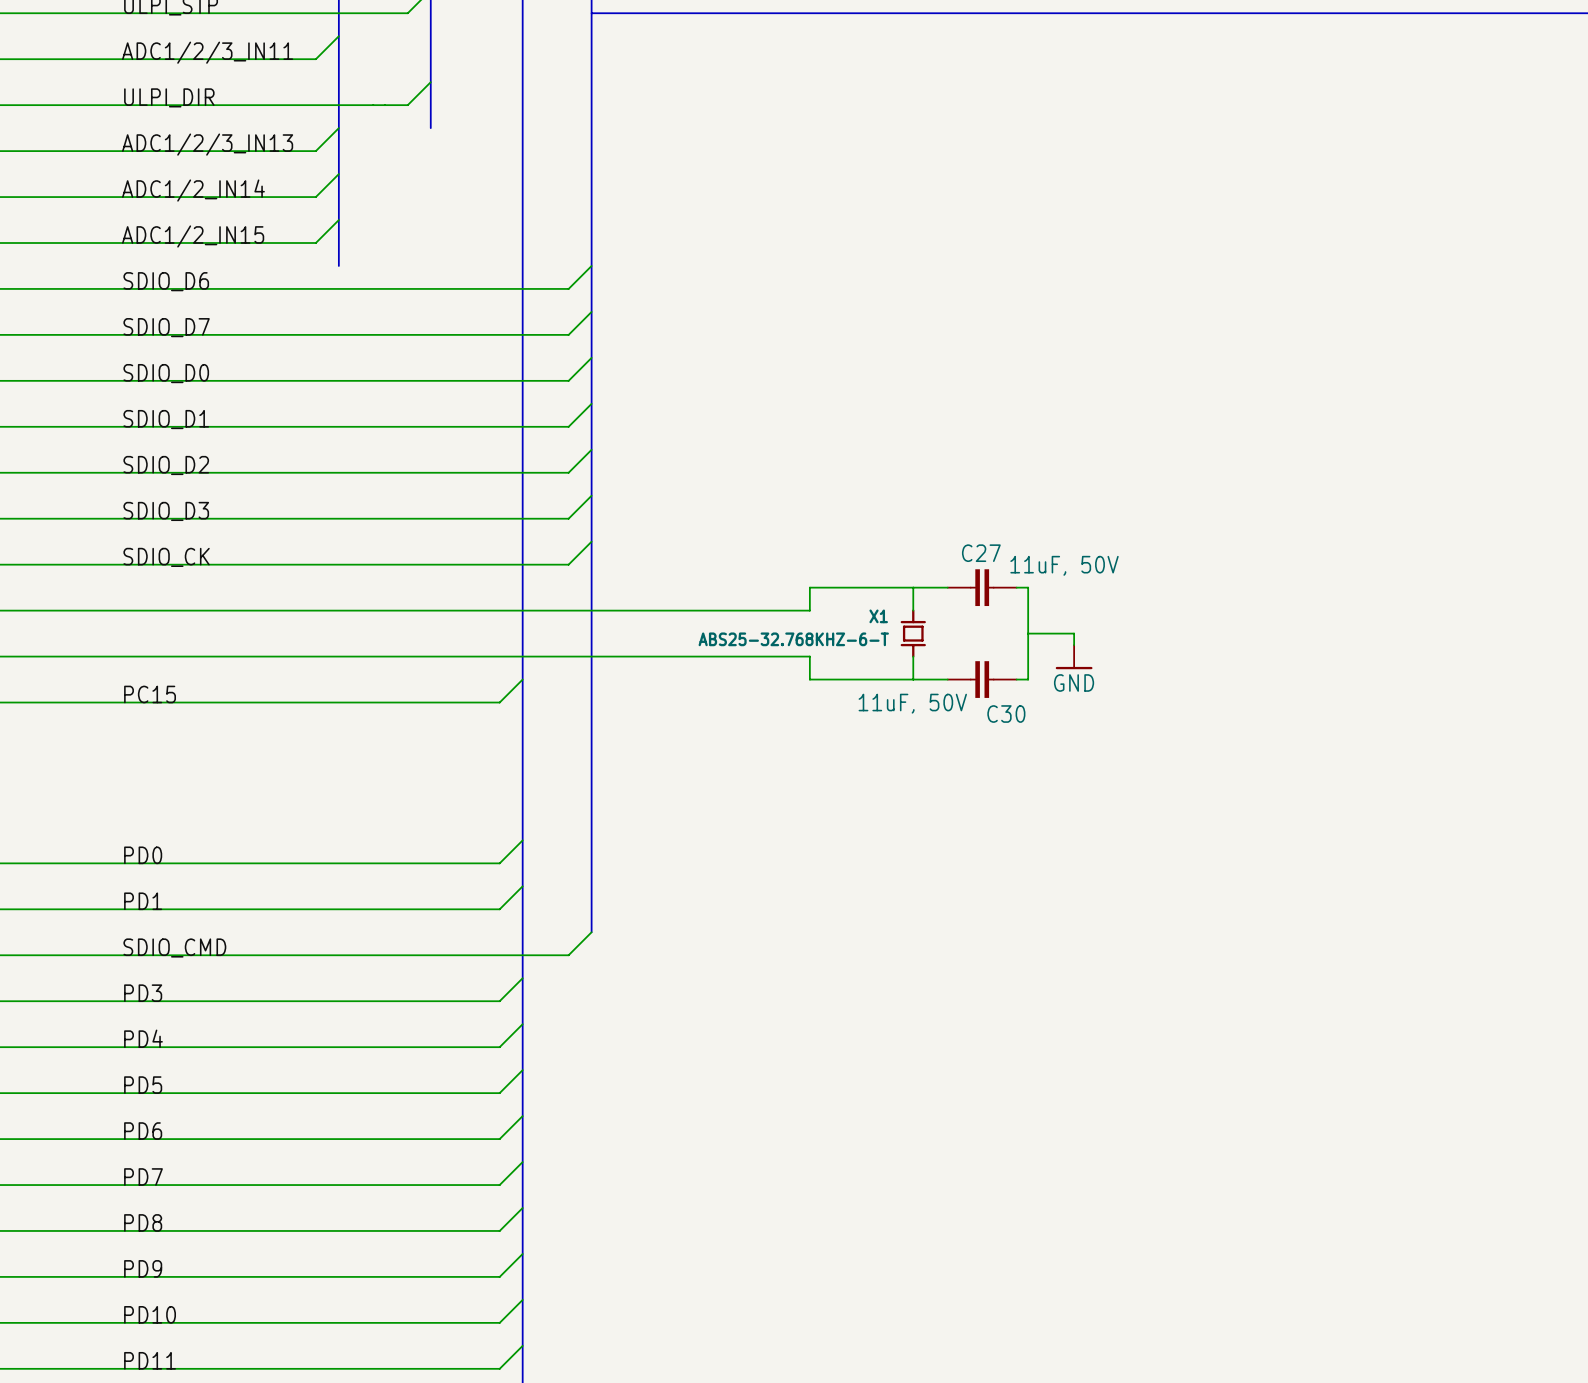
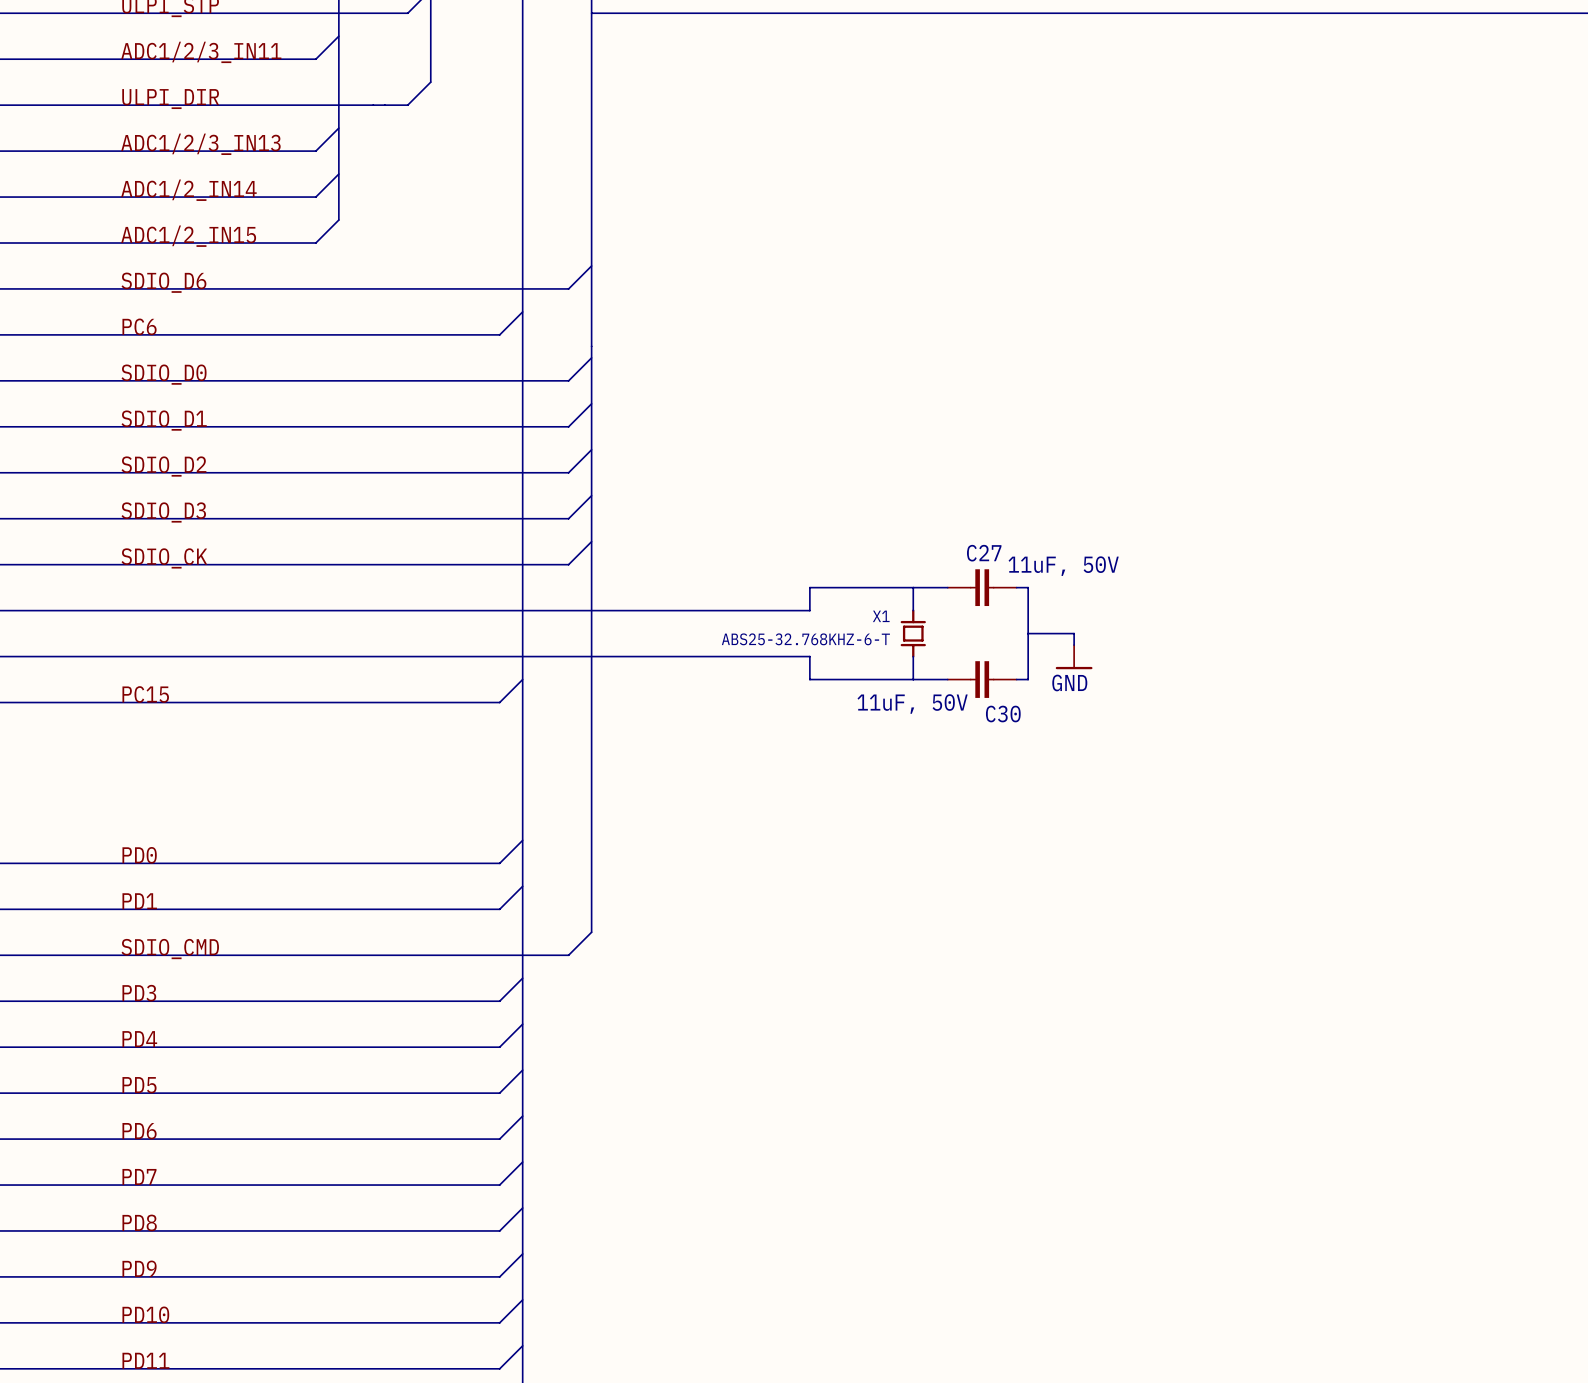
bus: (430, 82) (430, 128) -> none
bus: (338, 220) (338, 265) -> none
wire: (591, 311) (568, 334) (499, 334) -> (522, 311) (499, 334)
label: SDIO_D7 (166, 327) -> PC6 (139, 326)

